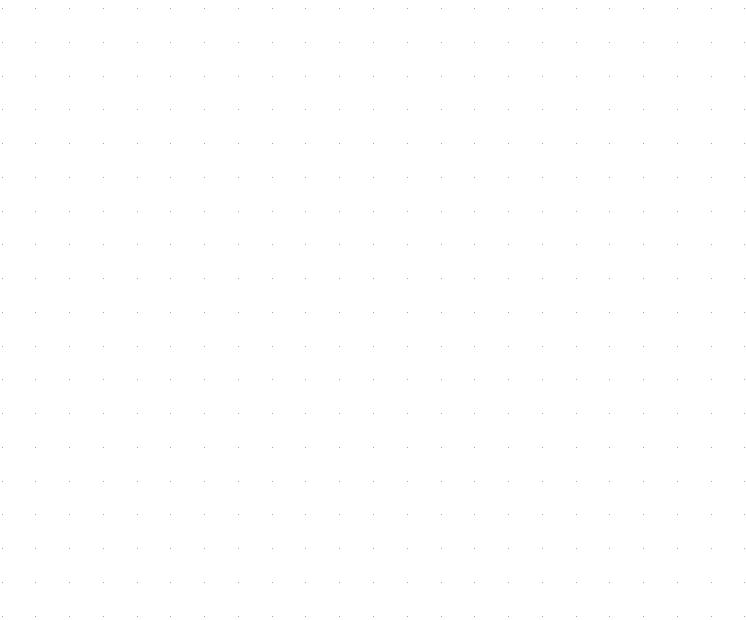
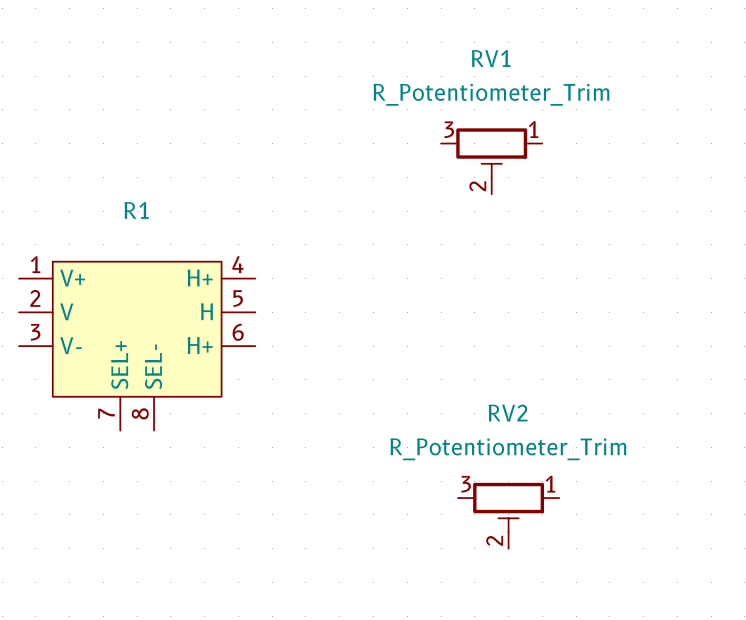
RV1: none -> R_Potentiometer_Trim (491, 161)
R1: none -> (137, 346)
RV2: none -> R_Potentiometer_Trim (508, 515)

